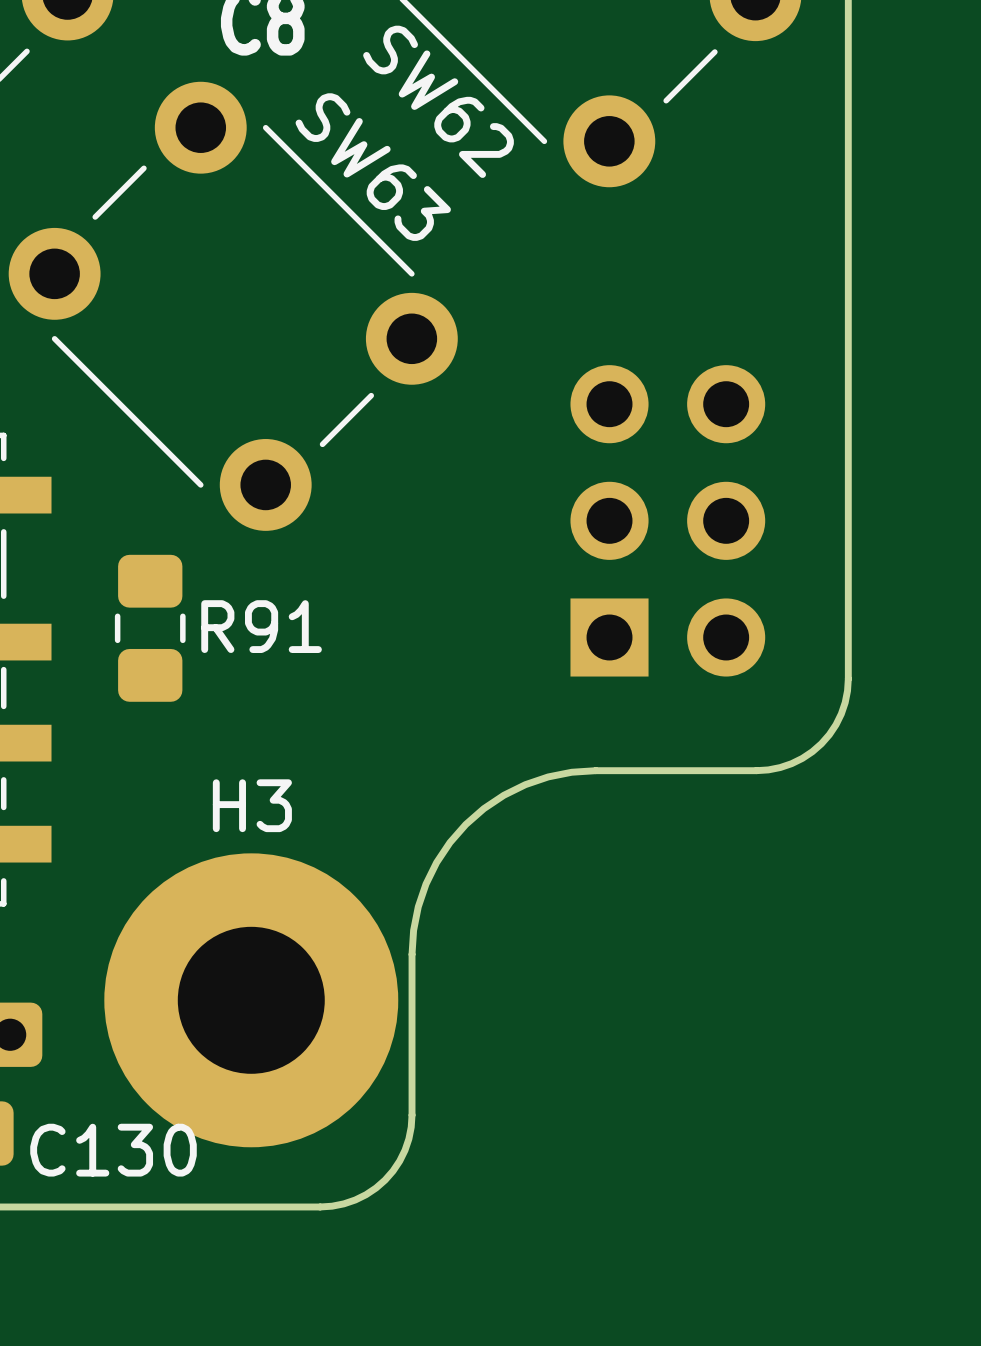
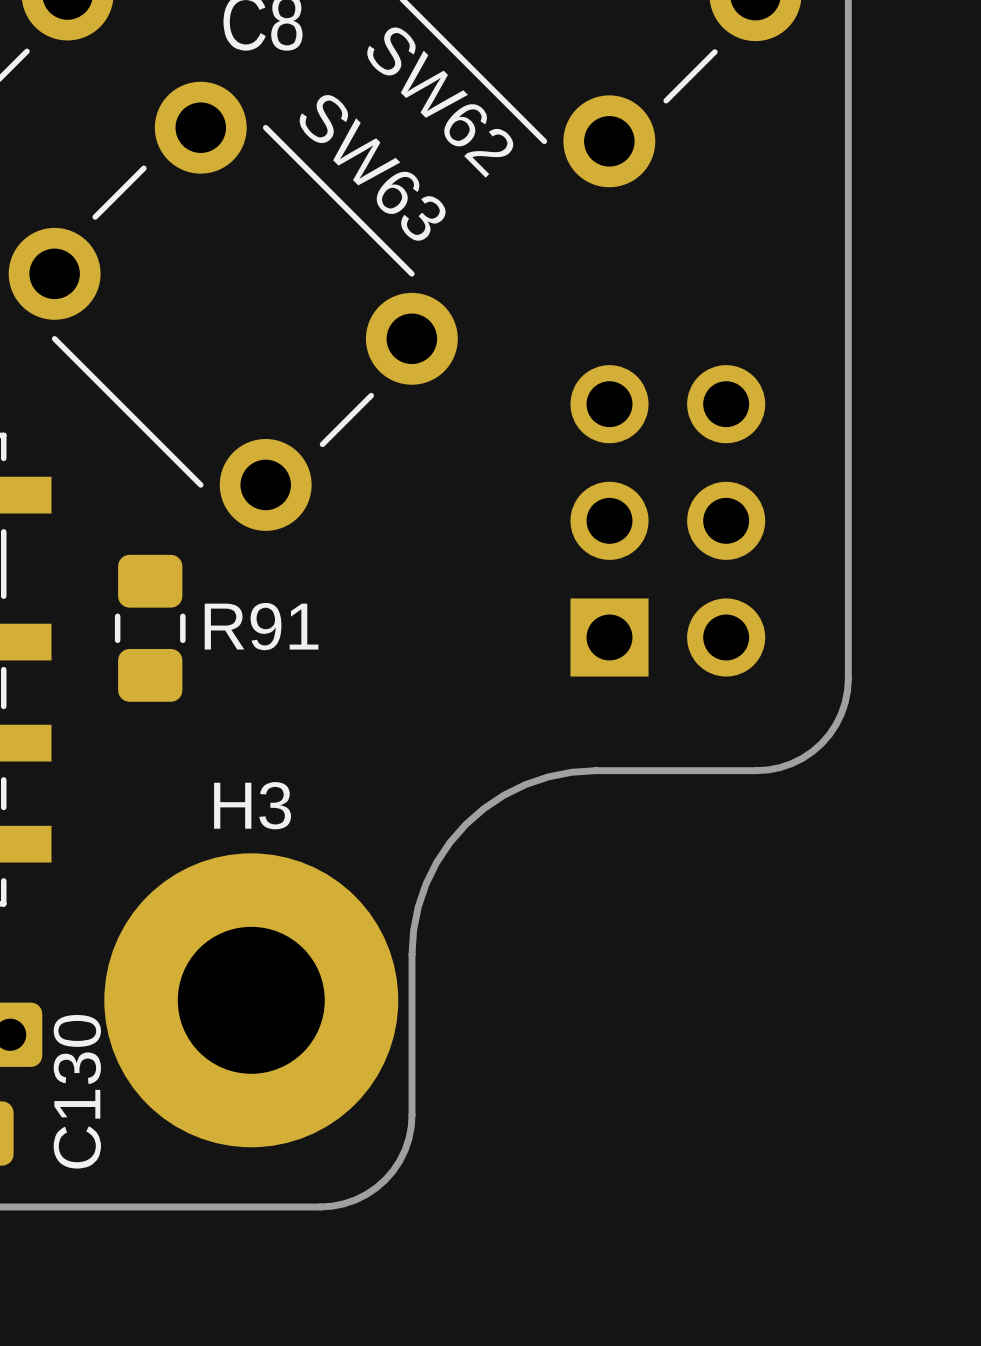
C130 name rotation: 0° (113, 1150) -> 90° counterclockwise (77, 1091)

